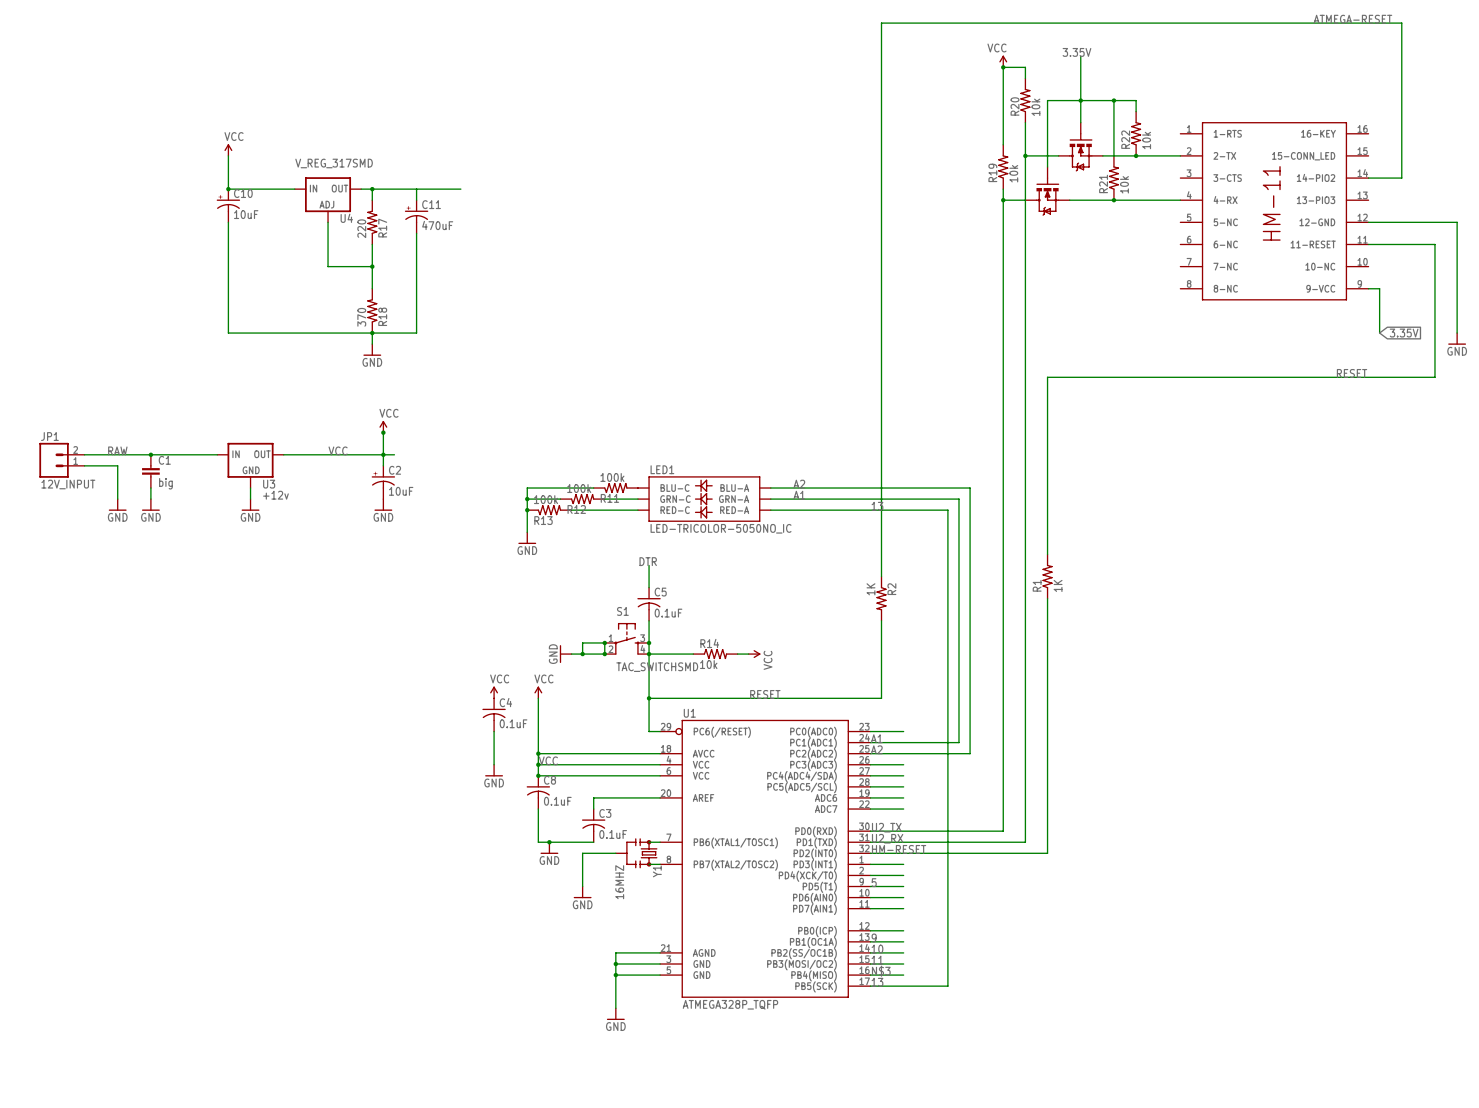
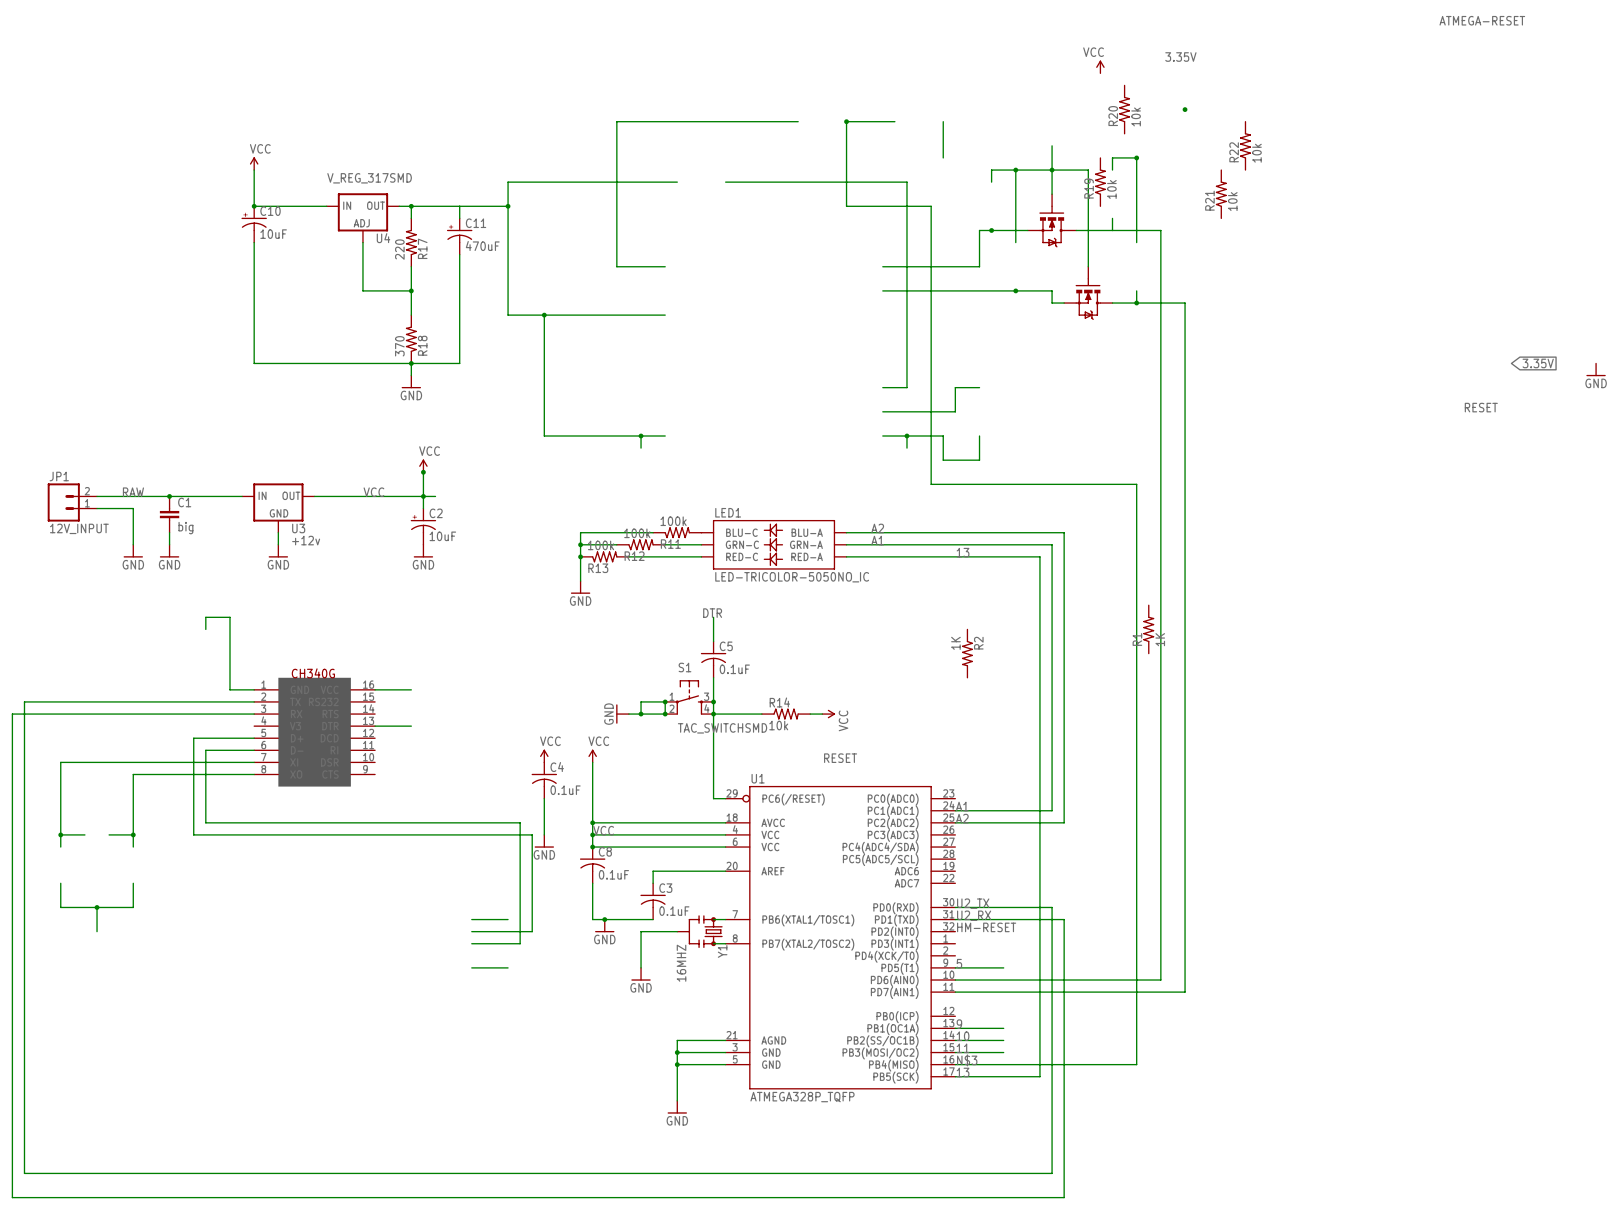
wire: (1080, 56) (1080, 122) -> none
junction: (1003, 67) -> none
wire: (1025, 78) (1025, 67) (1003, 67) (1003, 144) -> none
wire: (1113, 100) (1113, 155) -> none
junction: (1113, 100) -> none
wire: none -> (798, 121) (616, 121) (616, 266) (665, 266)
junction: none -> (846, 121)
wire: none -> (894, 121) (846, 121) (846, 206) (931, 206) (931, 484) (1136, 484) (1136, 1064) (991, 1064)
wire: none -> (943, 121) (943, 157)
wire: (1136, 111) (1136, 100) (1047, 100) (1047, 166) -> none
wire: (1025, 122) (1025, 842) (970, 842) -> (254, 714) (12, 714) (12, 1197) (1064, 1197) (1064, 919)
wire: none -> (1052, 145) (1052, 194)
part: (1080, 146) -> none
wire: none -> (1015, 170) (1015, 242)
junction: none -> (1015, 170)
junction: none -> (1052, 170)
wire: none -> (1112, 170) (1112, 157) (1136, 157) (1136, 242)
wire: (1025, 155) (1058, 155) -> none
junction position: (1025, 155) -> (1136, 157)
wire: (1102, 155) (1180, 155) -> none
junction: (1136, 155) -> none
wire: none -> (677, 182) (508, 182) (508, 315) (665, 315)
wire: none -> (725, 182) (906, 182) (906, 387) (882, 387)
wire: none -> (991, 182) (991, 170) (1088, 170) (1088, 266)
wire: (1368, 178) (1401, 178) (1401, 23) (881, 23) (881, 576) -> none
junction: none -> (508, 206)
wire: (1003, 189) (1003, 831) (958, 831) -> (254, 701) (24, 701) (24, 1173) (1052, 1173) (1052, 907)
part: (1047, 191) -> none
wire: (1003, 200) (1025, 200) -> none
junction: (1003, 200) -> none
wire: none -> (1112, 218) (1112, 230)
wire: (1069, 200) (1180, 200) -> none
junction: (1113, 200) -> none
part: none -> (1052, 220)
junction: none -> (991, 230)
wire: none -> (1027, 230) (979, 230) (979, 266) (882, 266)
wire: none -> (1076, 230) (1160, 230) (1160, 980) (991, 980)
part: (1274, 211) -> none
wire: (1368, 222) (1457, 222) (1457, 333) -> none
wire: (1368, 244) (1434, 244) (1434, 377) (1047, 377) (1047, 554) -> none
wire: none -> (882, 290) (1052, 290) (1052, 303) (1064, 303)
junction: none -> (1015, 290)
wire: none -> (1136, 290) (1136, 303)
part: none -> (1088, 293)
wire: none -> (1112, 303) (1185, 303) (1185, 992) (991, 992)
junction: none -> (1136, 303)
wire: none -> (544, 315) (544, 436) (665, 436)
junction: none -> (544, 315)
wire: (1368, 288) (1379, 288) (1379, 333) -> none
wire: none -> (979, 387) (955, 387) (955, 411) (882, 411)
wire: none -> (641, 436) (641, 448)
junction: none -> (641, 436)
wire: none -> (882, 436) (943, 436) (943, 460) (979, 460) (979, 436)
wire: none -> (906, 436) (906, 448)
junction: none -> (906, 436)
wire: none -> (205, 629) (205, 617) (230, 617) (230, 689) (254, 689)
wire: (1047, 598) (1047, 853) (870, 853) -> none
wire: (881, 620) (881, 698) (649, 698) -> none
wire: none -> (375, 689) (411, 689)
wire: none -> (375, 726) (411, 726)
part: none -> (314, 732)
wire: none -> (254, 738) (193, 738) (193, 834) (532, 834) (532, 931) (471, 931)
wire: none -> (254, 750) (205, 750) (205, 822) (520, 822) (520, 943) (471, 943)
wire: none -> (254, 762) (60, 762) (60, 847)
junction: (649, 698) -> none
wire: none -> (254, 774) (133, 774) (133, 847)
wire: (870, 731) (903, 731) -> none
wire: none -> (60, 834) (84, 834)
junction: none -> (60, 834)
wire: none -> (109, 834) (133, 834)
junction: none -> (133, 834)
wire: (870, 764) (903, 764) -> none
wire: (870, 775) (903, 775) -> none
wire: (870, 786) (903, 786) -> none
wire: (870, 797) (903, 797) -> none
wire: none -> (60, 883) (60, 907) (133, 907) (133, 883)
wire: (870, 809) (903, 809) -> none
wire: none -> (97, 907) (97, 931)
junction: none -> (97, 907)
wire: none -> (471, 919) (508, 919)
wire: (870, 864) (903, 864) -> none
wire: (870, 875) (903, 875) -> none
wire: none -> (471, 967) (508, 967)
wire: none -> (991, 967) (1003, 967)
wire: (870, 930) (903, 930) -> none
wire: none -> (991, 1028) (1003, 1028)
wire: none -> (991, 1040) (1003, 1040)
wire: none -> (991, 1052) (1003, 1052)

